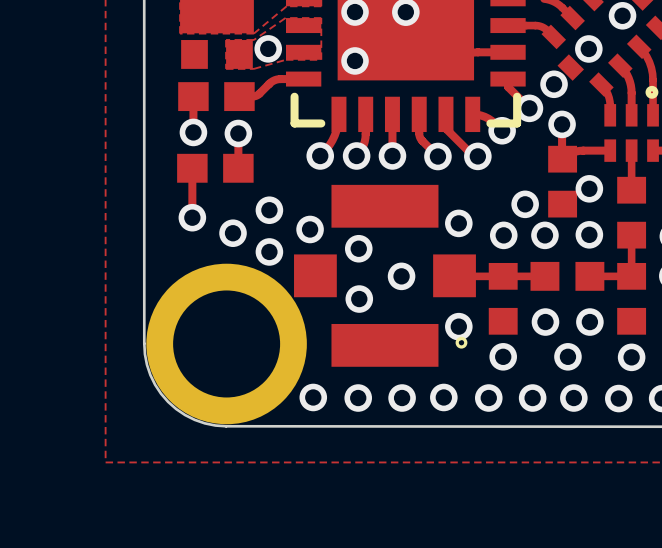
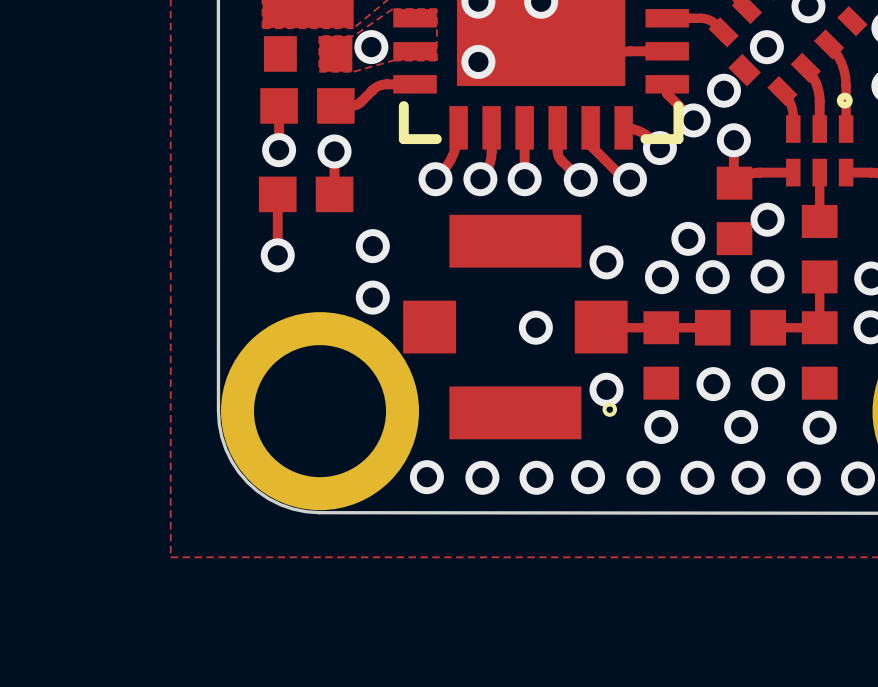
via: (310, 229) -> none
via: (233, 233) -> none
via: (358, 248) -> none
via: (359, 299) -> none

